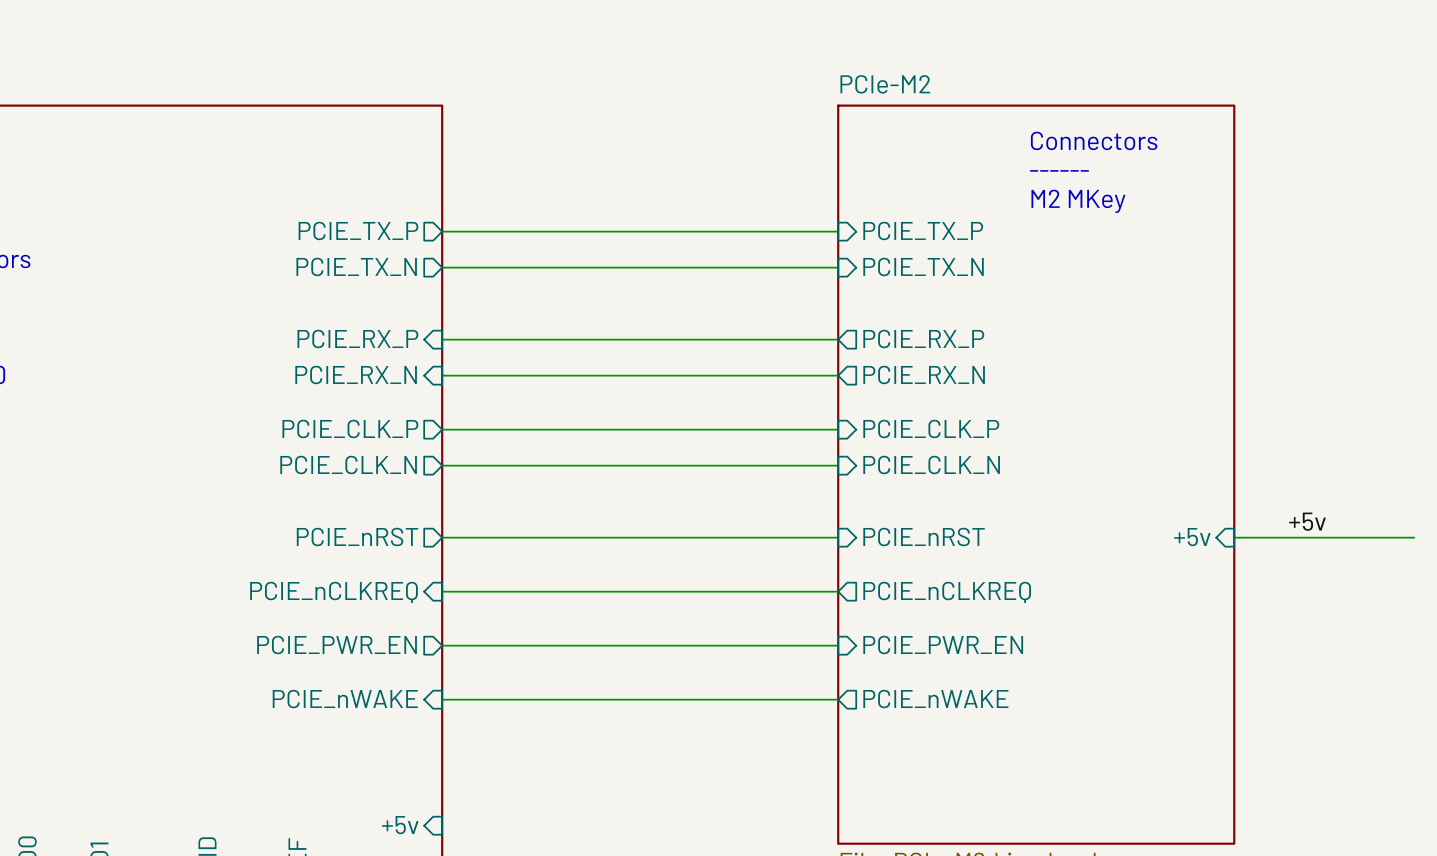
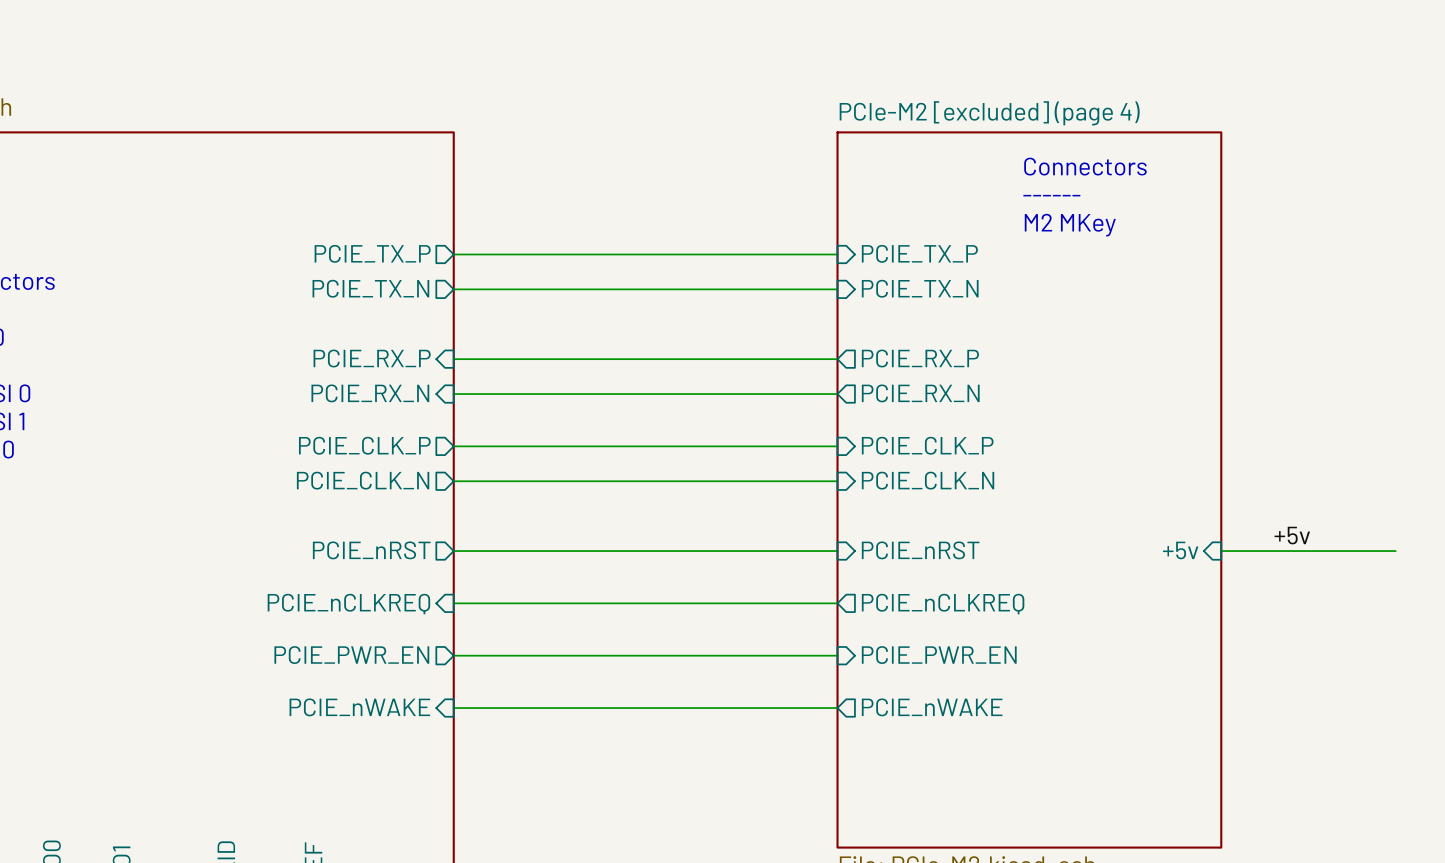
sheet PCIe-M2 name: PCIe-M2 (885, 84) -> PCIe-M2 [excluded] (page 4) (989, 113)
sheet pin: +5v (400, 825) -> none

